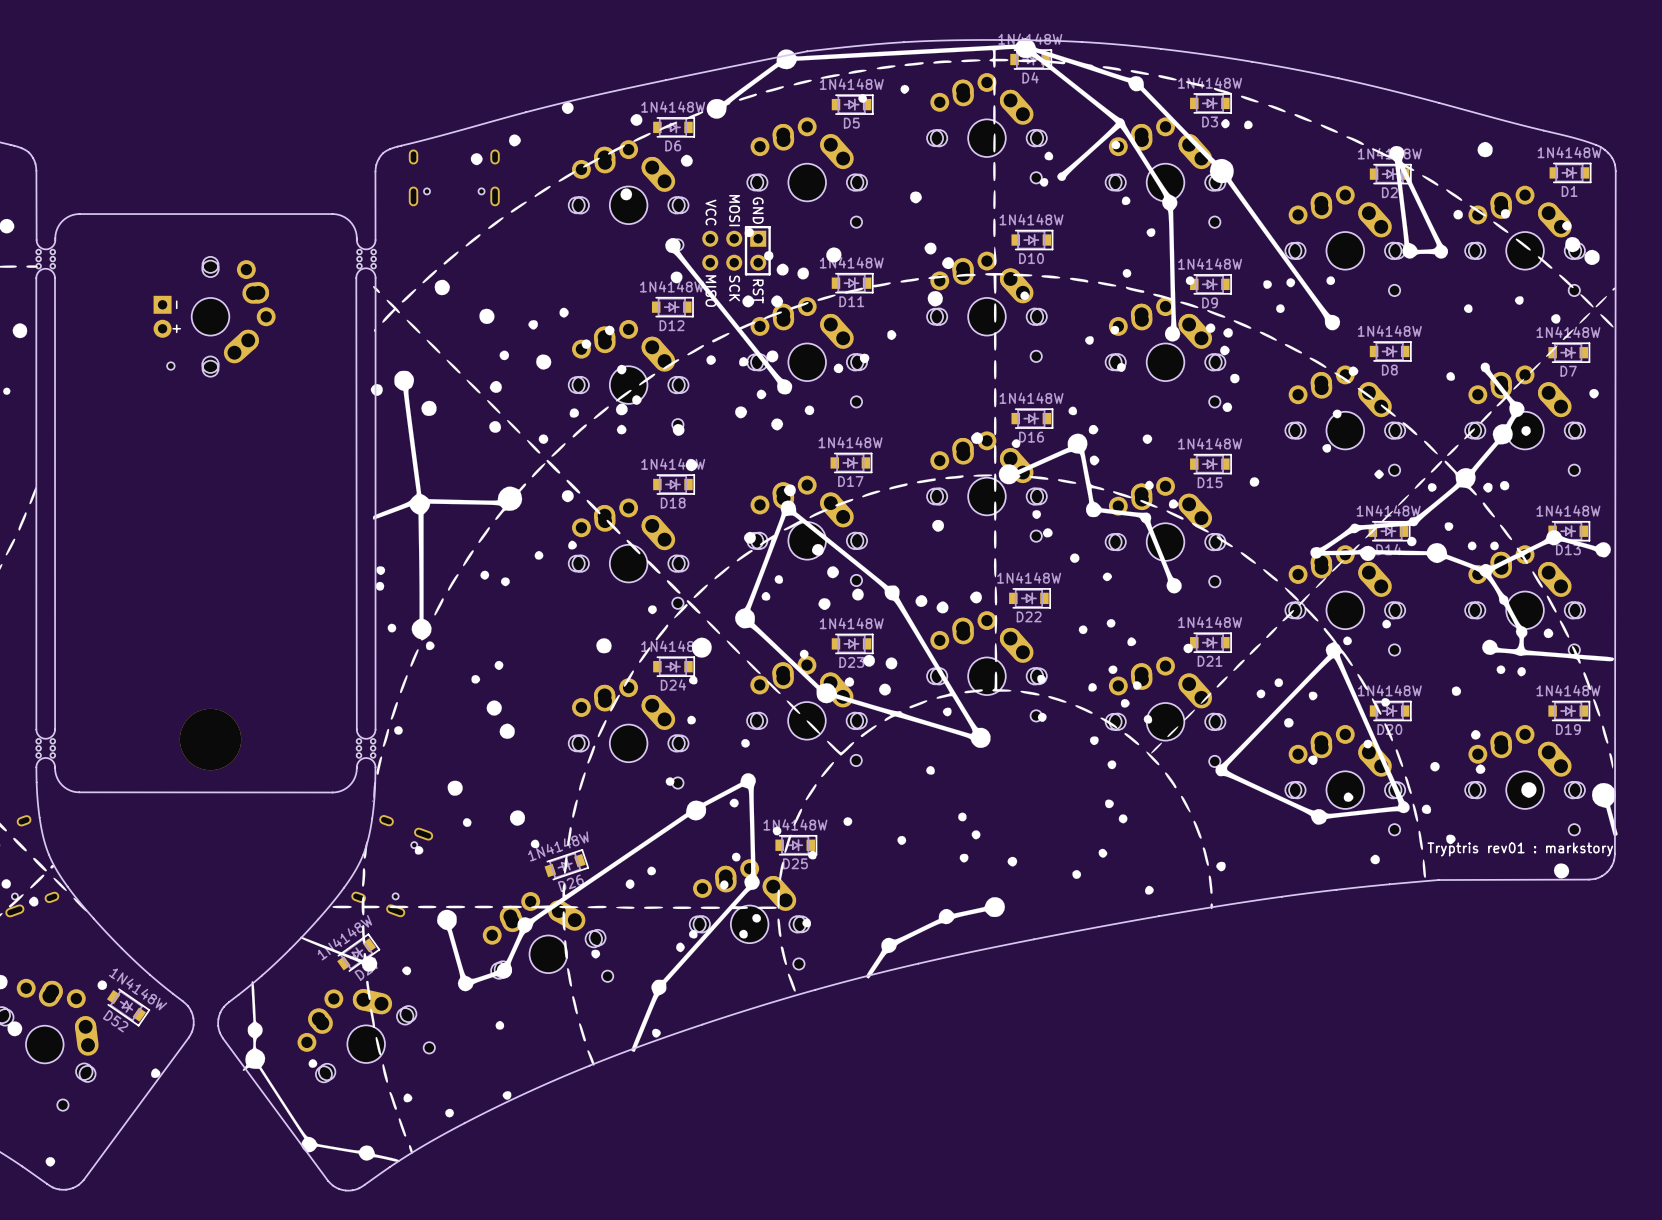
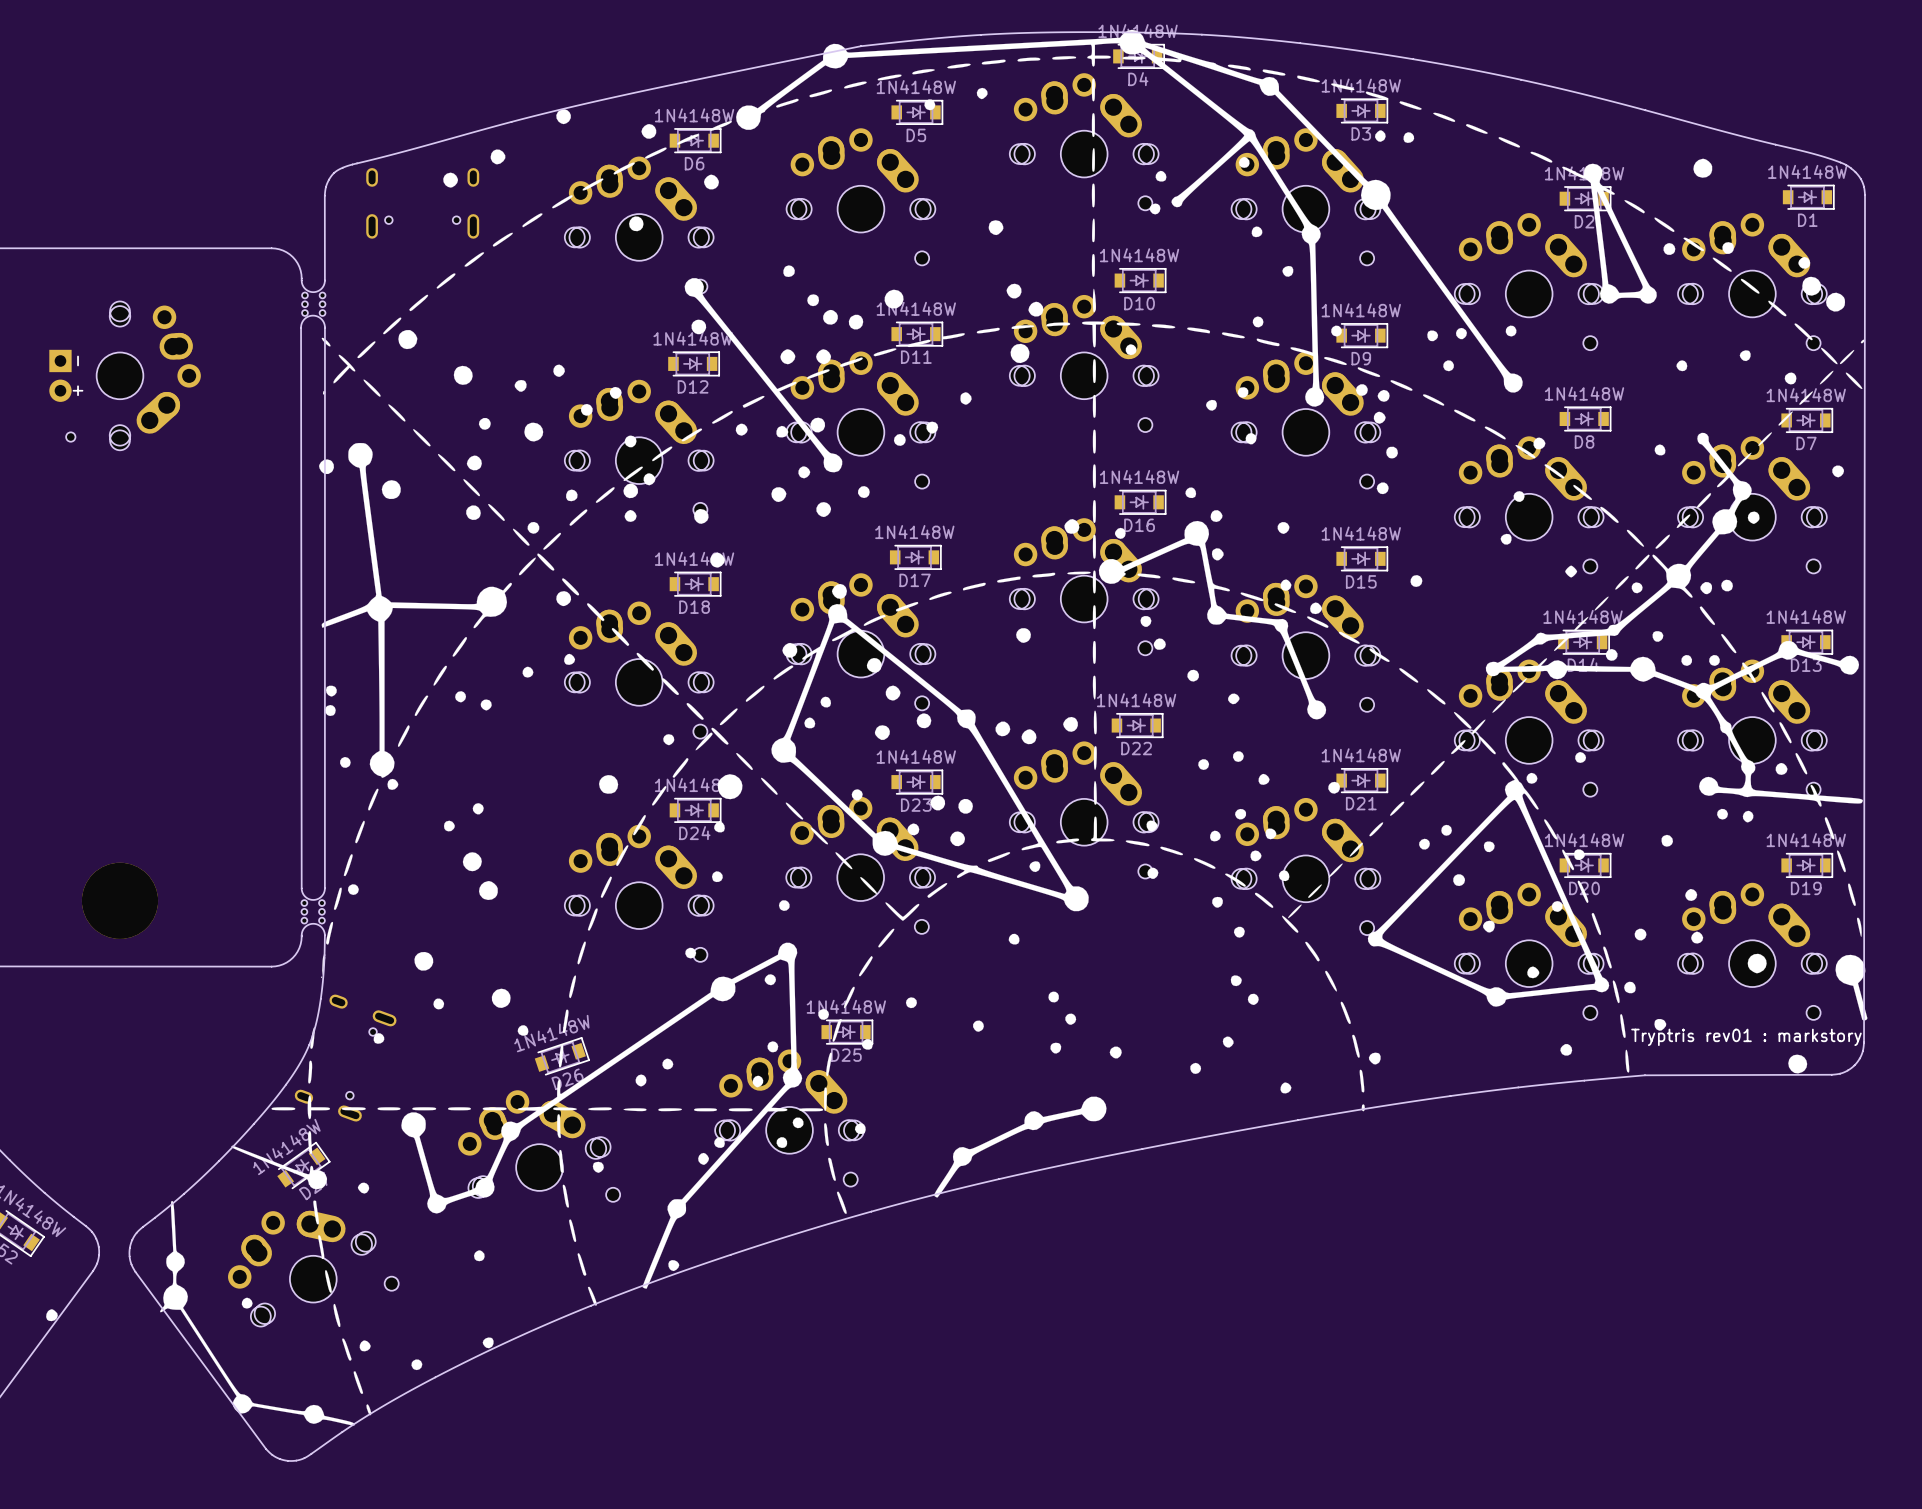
part: (736, 250) -> none

